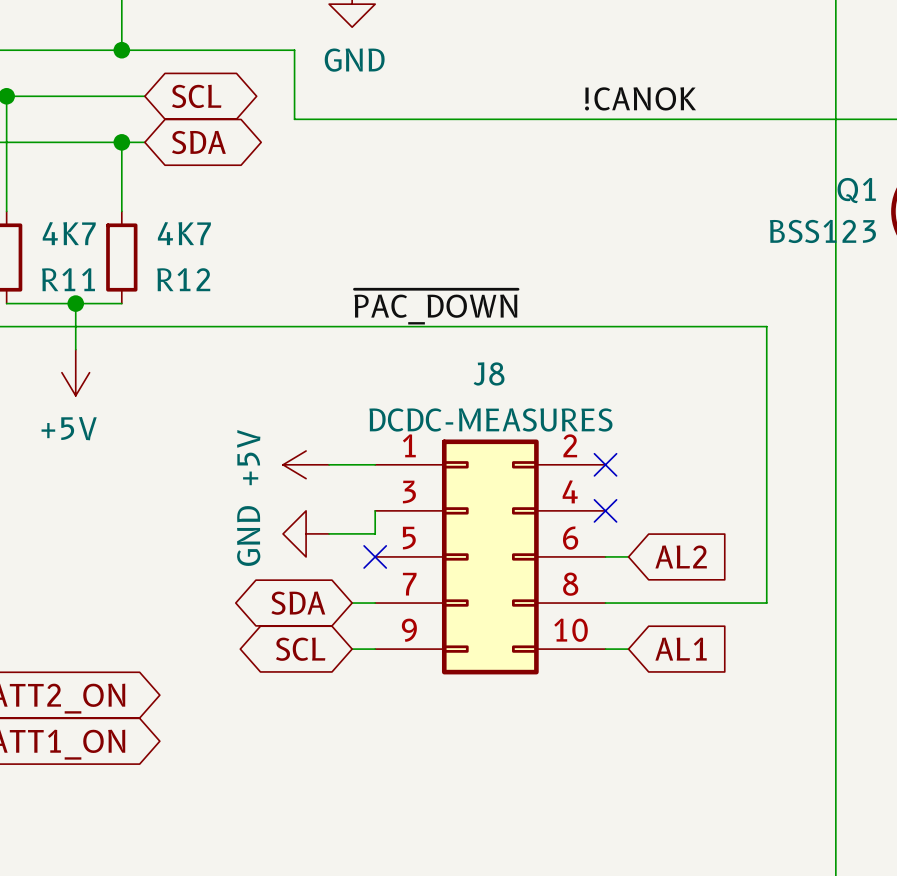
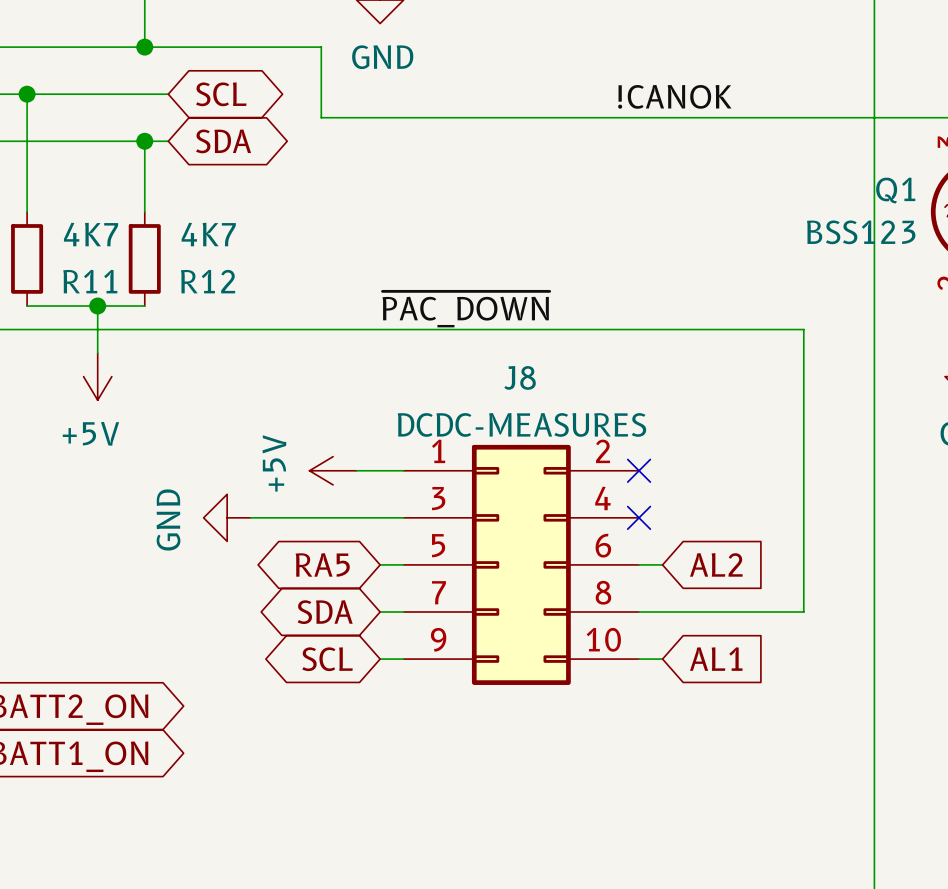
wire: (375, 510) (375, 533) (329, 533) -> (403, 517) (250, 517)
power symbol position: GND (306, 533) -> GND (227, 517)
global label: none -> RA5 (322, 564)
wire: none -> (380, 564) (403, 564)
no-connect mark: (375, 556) -> none

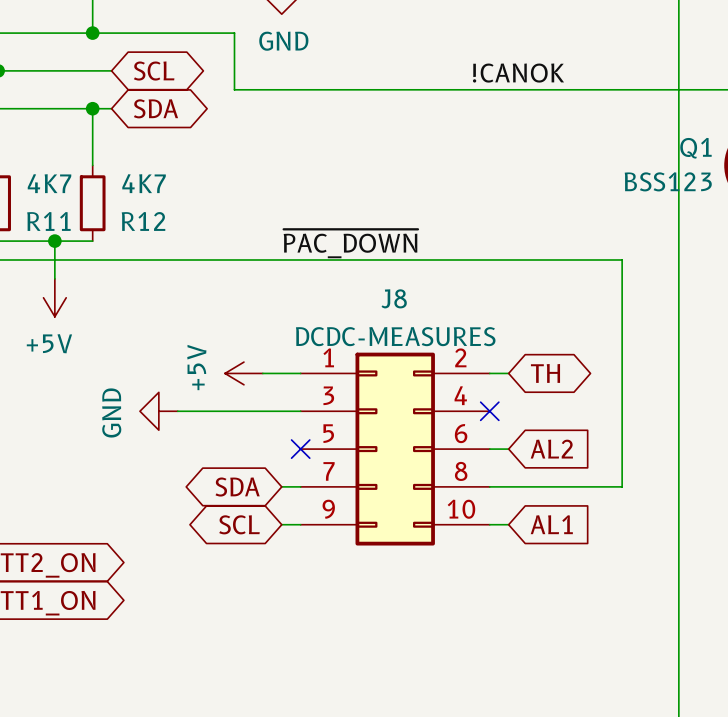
no-connect mark: (639, 470) -> none
global label: none -> TH (545, 373)
global label: RA5 (322, 564) -> none
wire: (380, 564) (403, 564) -> (489, 373) (508, 373)
no-connect mark: none -> (300, 449)

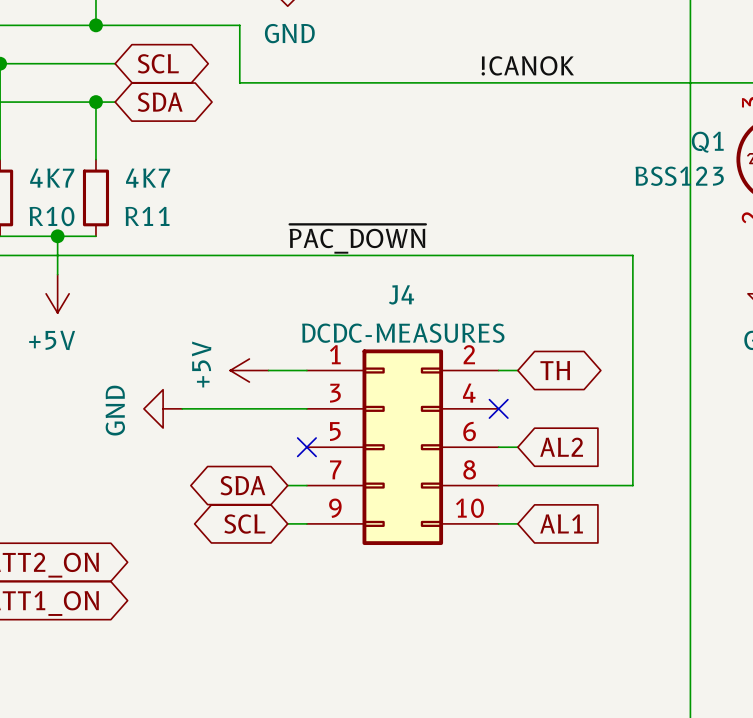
R11 name: R11 (48, 221) -> R10 (51, 216)
R12 name: R12 (143, 221) -> R11 (147, 216)
J8 name: J8 (394, 298) -> J4 (401, 294)

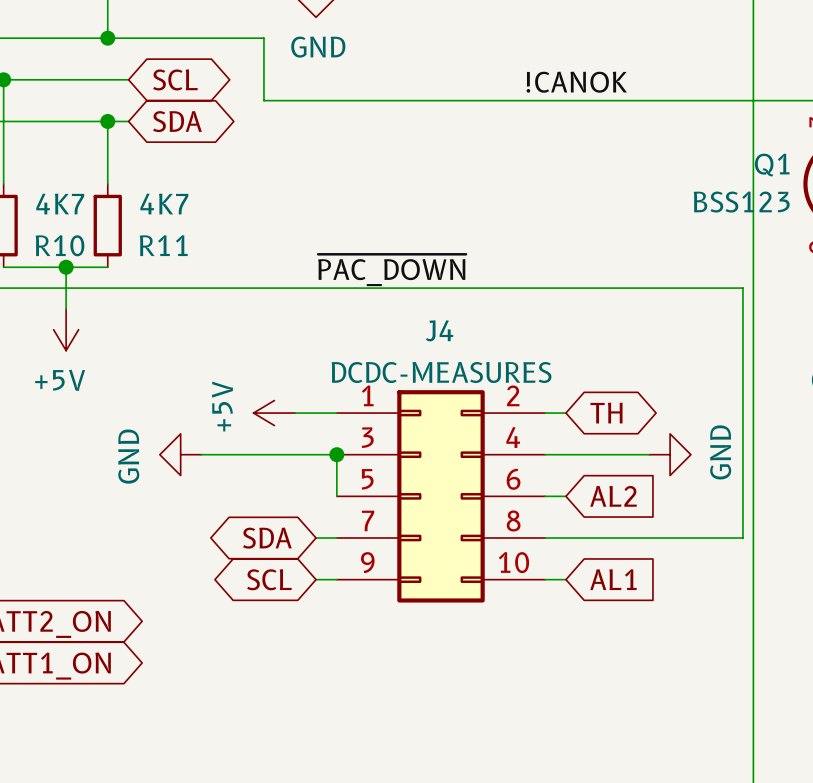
wire: (632, 255) (632, 485) -> (690, 288) (742, 288) (742, 538) (690, 538)
wire: none -> (336, 454) (336, 496)
junction: none -> (336, 454)
wire: none -> (545, 454) (649, 454)
no-connect mark: (498, 408) -> none
power symbol: none -> GND (670, 454)
no-connect mark: (306, 447) -> none

